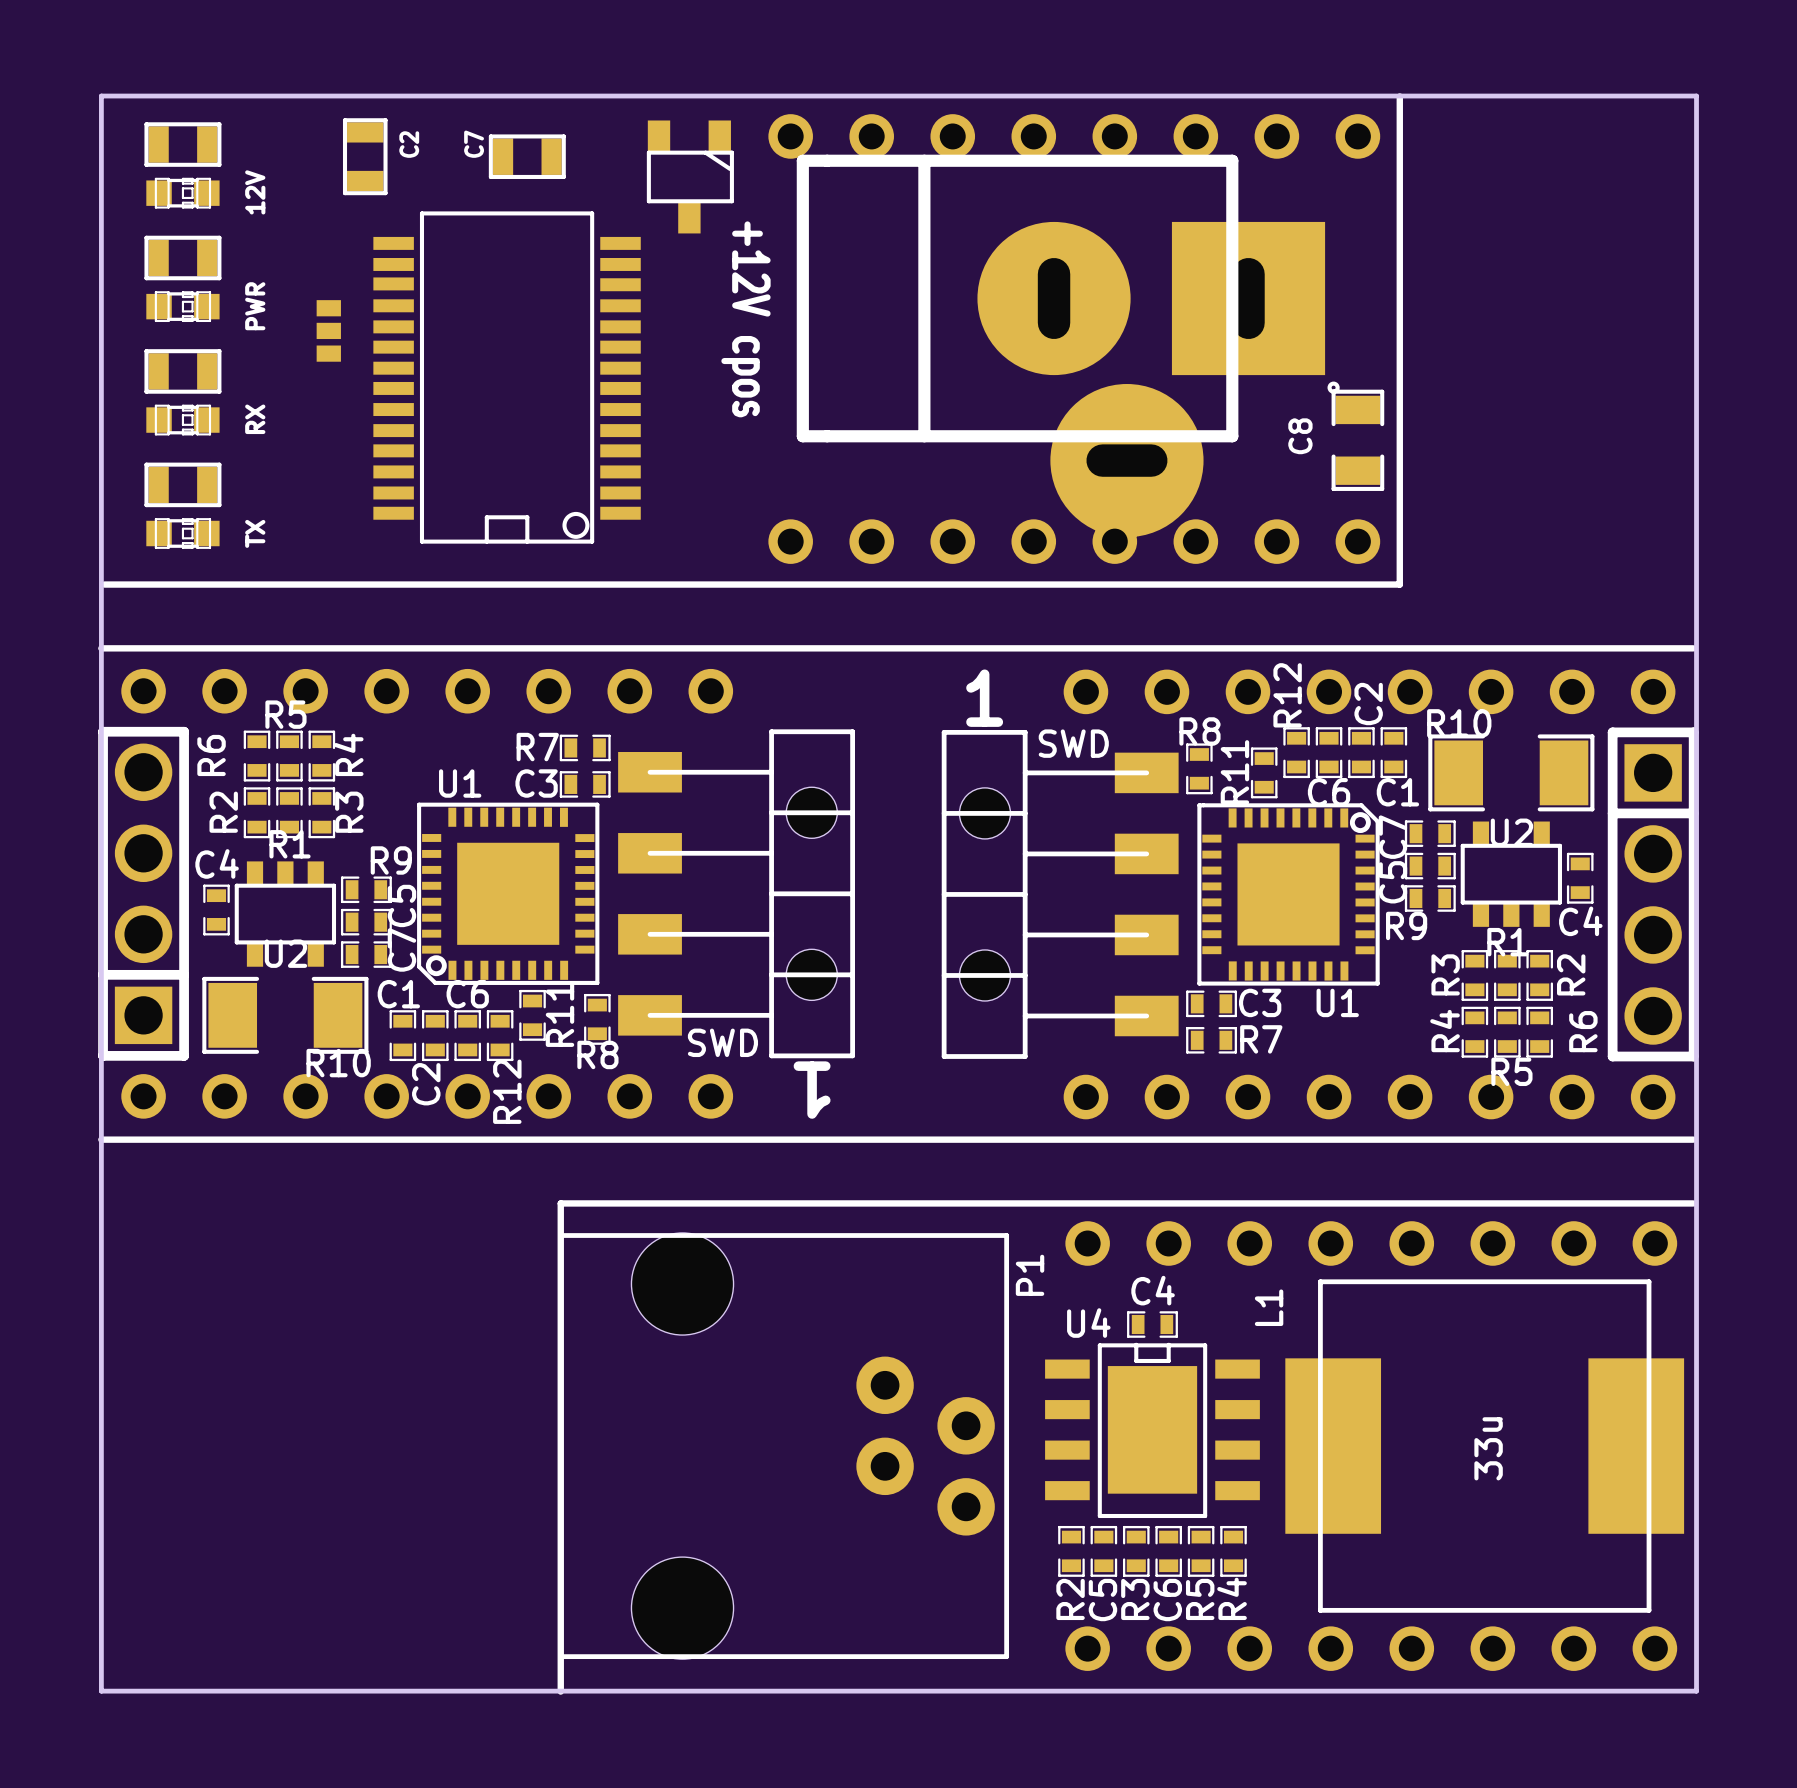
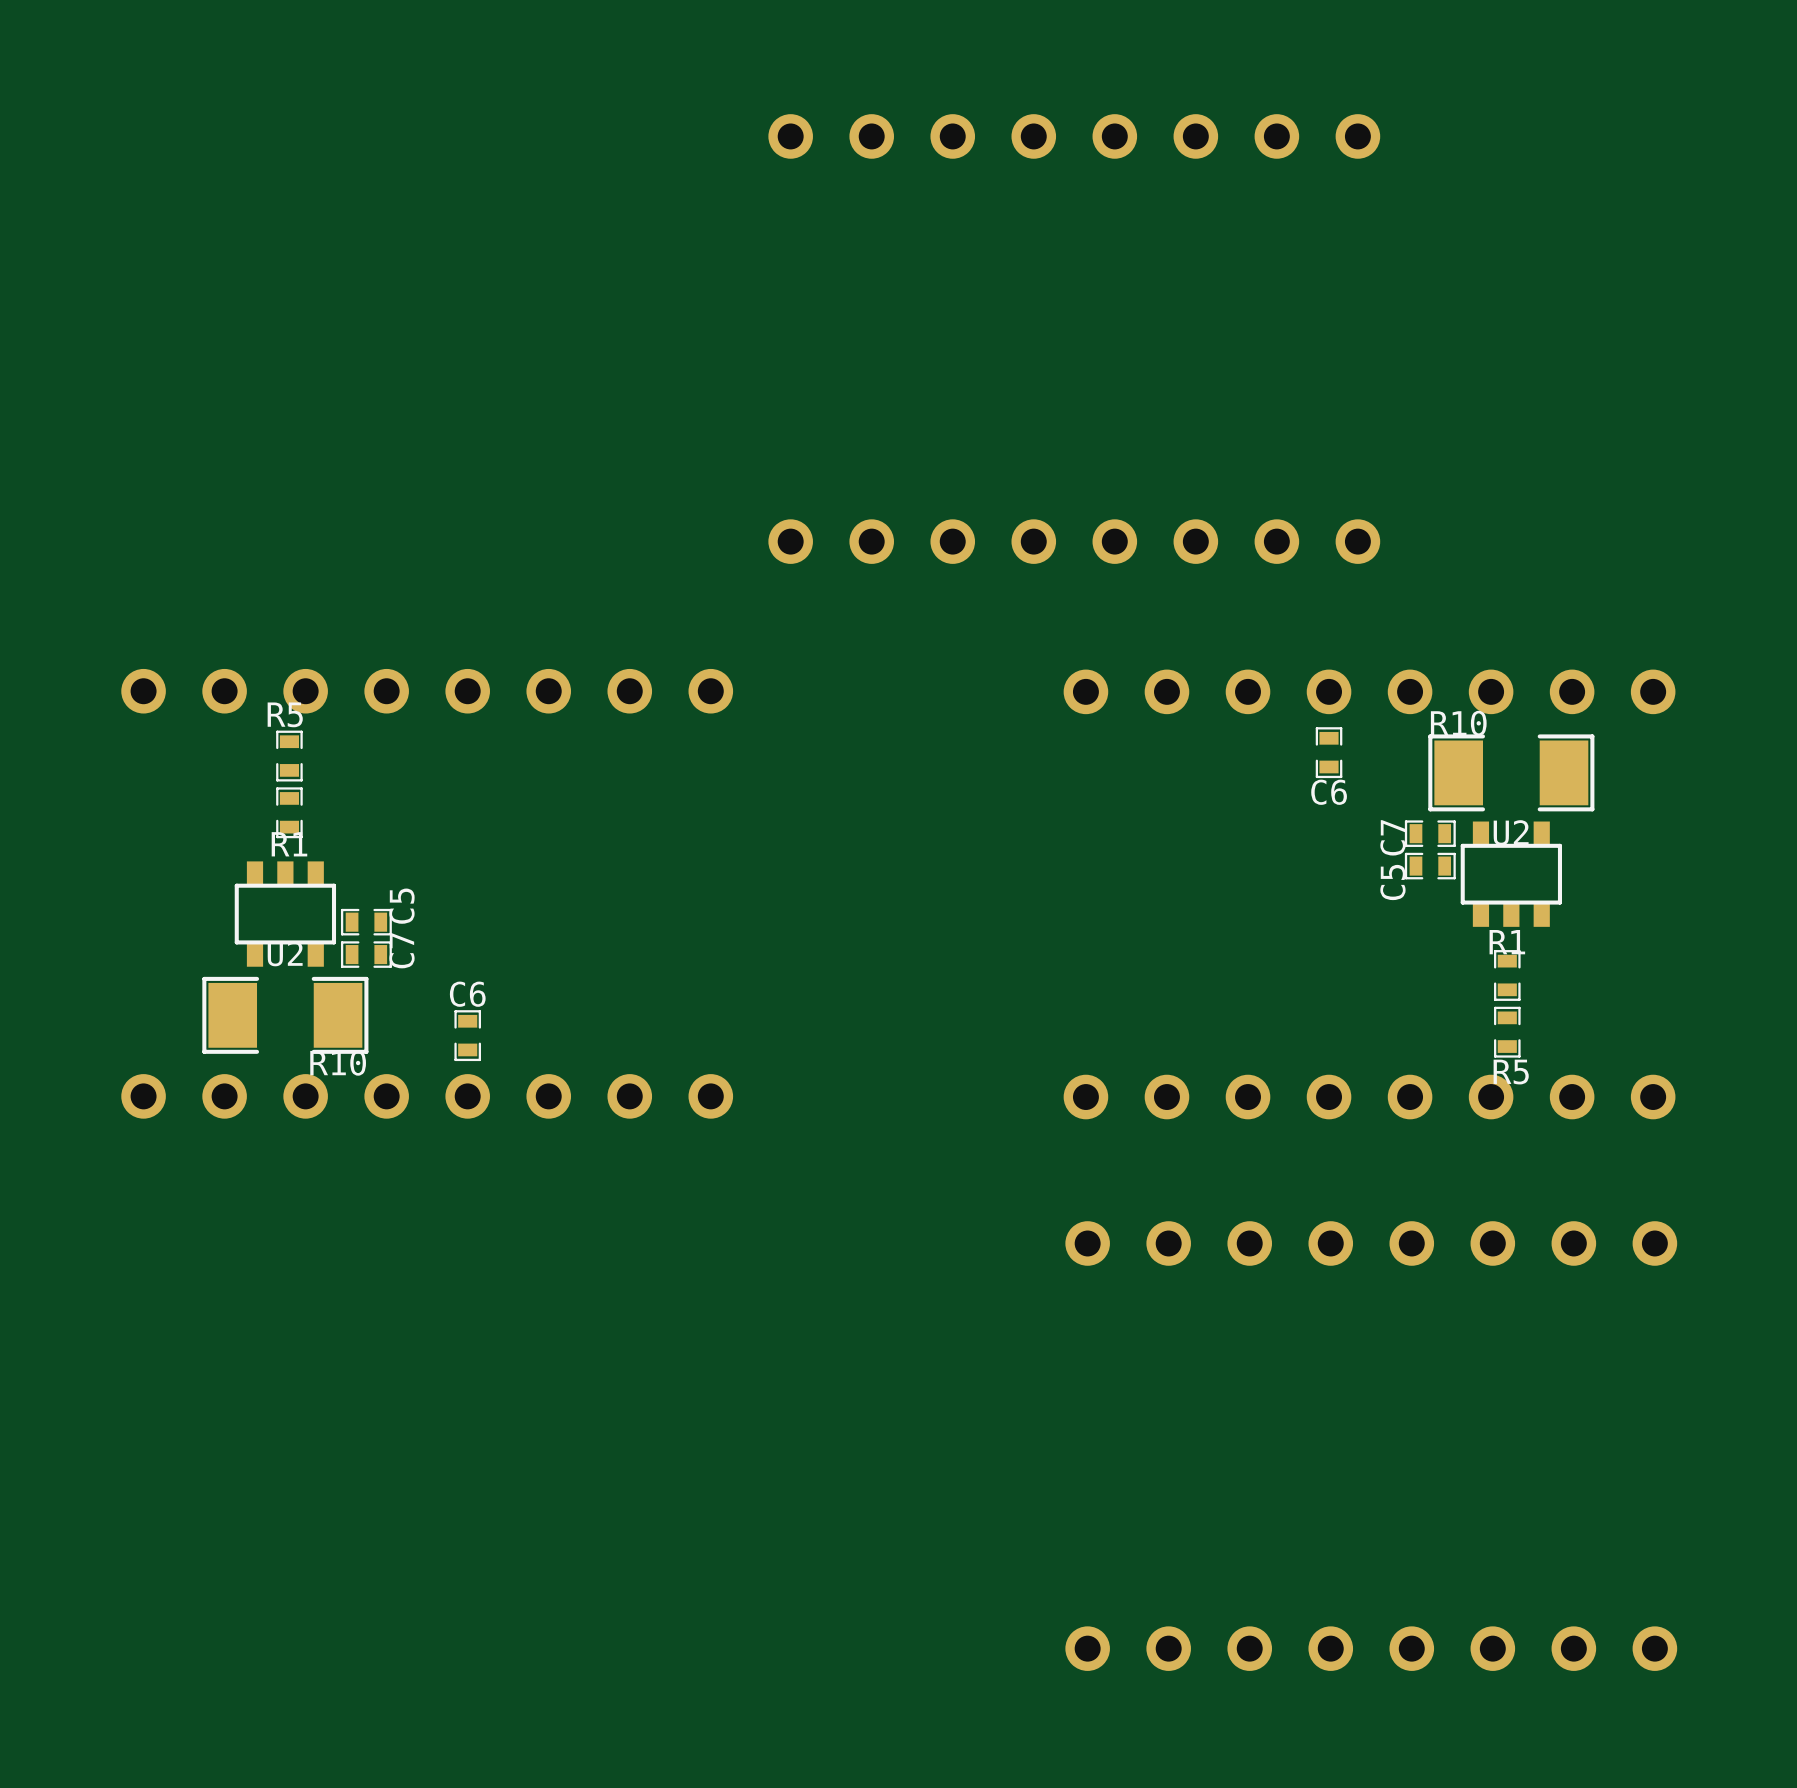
board edge: (101, 96) (1696, 96) (1696, 1691) (101, 1691) (101, 96) -> none
line: (1399, 96) (1399, 584) (104, 584) -> none
part: (182, 144) -> none
C2: (365, 156) -> none
C7: (527, 156) -> none
part: (690, 176) -> none
part: 12V (182, 193) -> none
part: (182, 257) -> none
part: PWR (182, 306) -> none
text: +12V cpos (745, 319) -> none
part: (328, 330) -> none
part: (1060, 345) -> none
part: (182, 371) -> none
part: (507, 377) -> none
part: RX (182, 420) -> none
C8: (1355, 436) -> none
part: (182, 484) -> none
part: TX (182, 533) -> none
line: (101, 648) (1693, 648) -> none
text: 1 (984, 698) -> none
R7: (585, 747) -> none
R12: (1296, 752) -> none
C2: (1361, 752) -> none
C1: (1393, 752) -> none
R6: (257, 756) -> none
R4: (321, 756) -> none
R8: (1199, 768) -> none
R11: (1264, 772) -> none
C3: (585, 784) -> none
R2: (257, 812) -> none
R3: (321, 812) -> none
C4: (1580, 878) -> none
R9: (366, 889) -> none
part: (143, 893) -> none
U1: (508, 893) -> none
part: SWD (736, 893) -> none
part: SWD (1060, 894) -> none
U1: (1288, 894) -> none
part: (1653, 894) -> none
R9: (1430, 898) -> none
C4: (216, 910) -> none
R3: (1474, 975) -> none
R2: (1539, 975) -> none
C3: (1211, 1003) -> none
R11: (532, 1015) -> none
R8: (597, 1019) -> none
R4: (1474, 1032) -> none
R6: (1539, 1032) -> none
C1: (402, 1035) -> none
C2: (435, 1035) -> none
R12: (500, 1035) -> none
R7: (1211, 1040) -> none
text: 1 (812, 1090) -> none
line: (101, 1139) (1693, 1139) -> none
line: (1693, 1203) (560, 1203) (560, 1691) -> none
C4: (1152, 1324) -> none
U4: (1152, 1430) -> none
P1: (784, 1446) -> none
L1: 33u (1484, 1446) -> none
R2: (1071, 1551) -> none
C5: (1103, 1551) -> none
R3: (1136, 1551) -> none
C6: (1168, 1551) -> none
R5: (1201, 1551) -> none
R4: (1233, 1551) -> none

